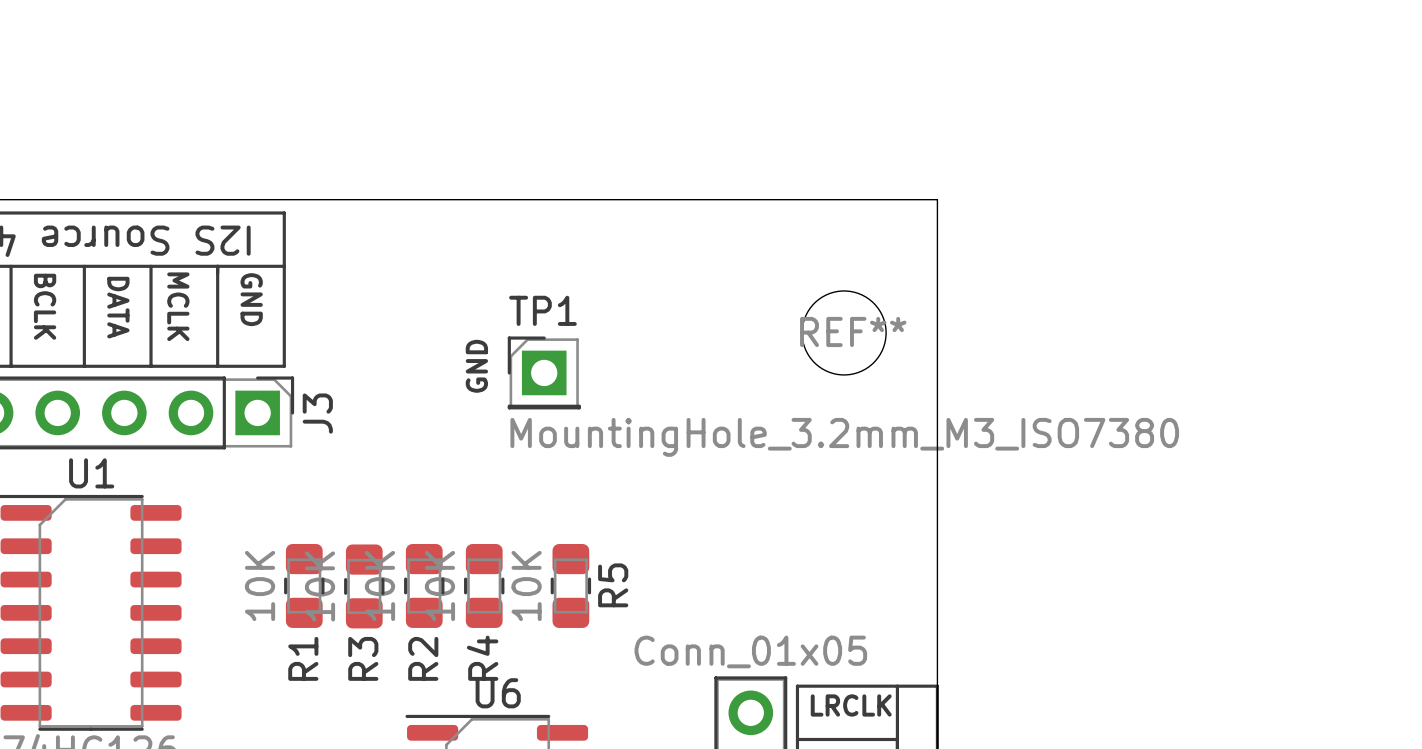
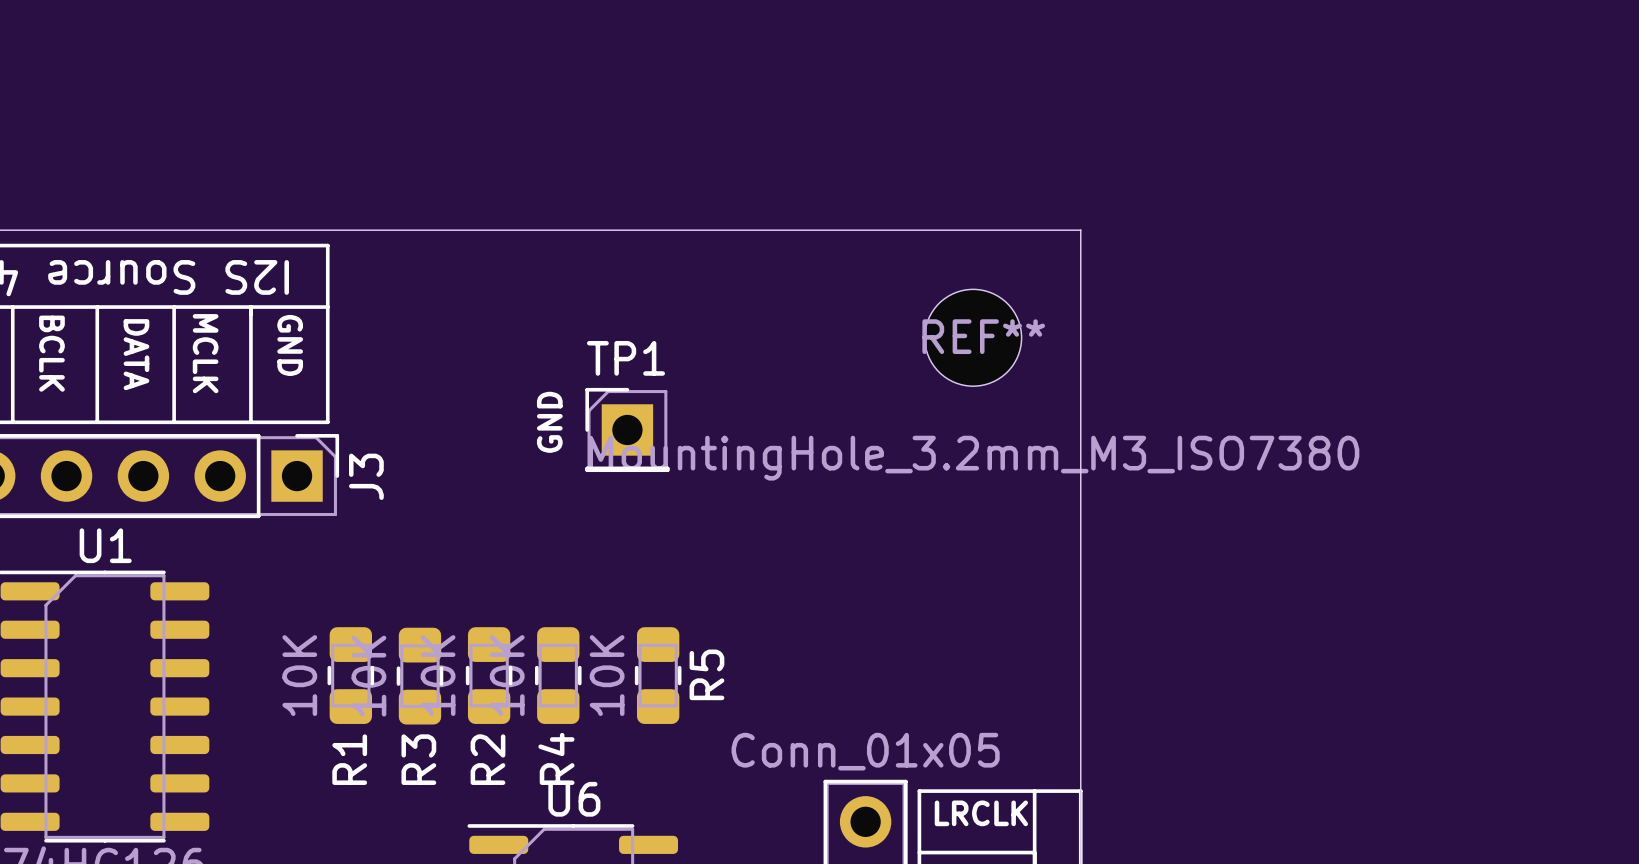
REF** position: (844, 332) -> (973, 337)

